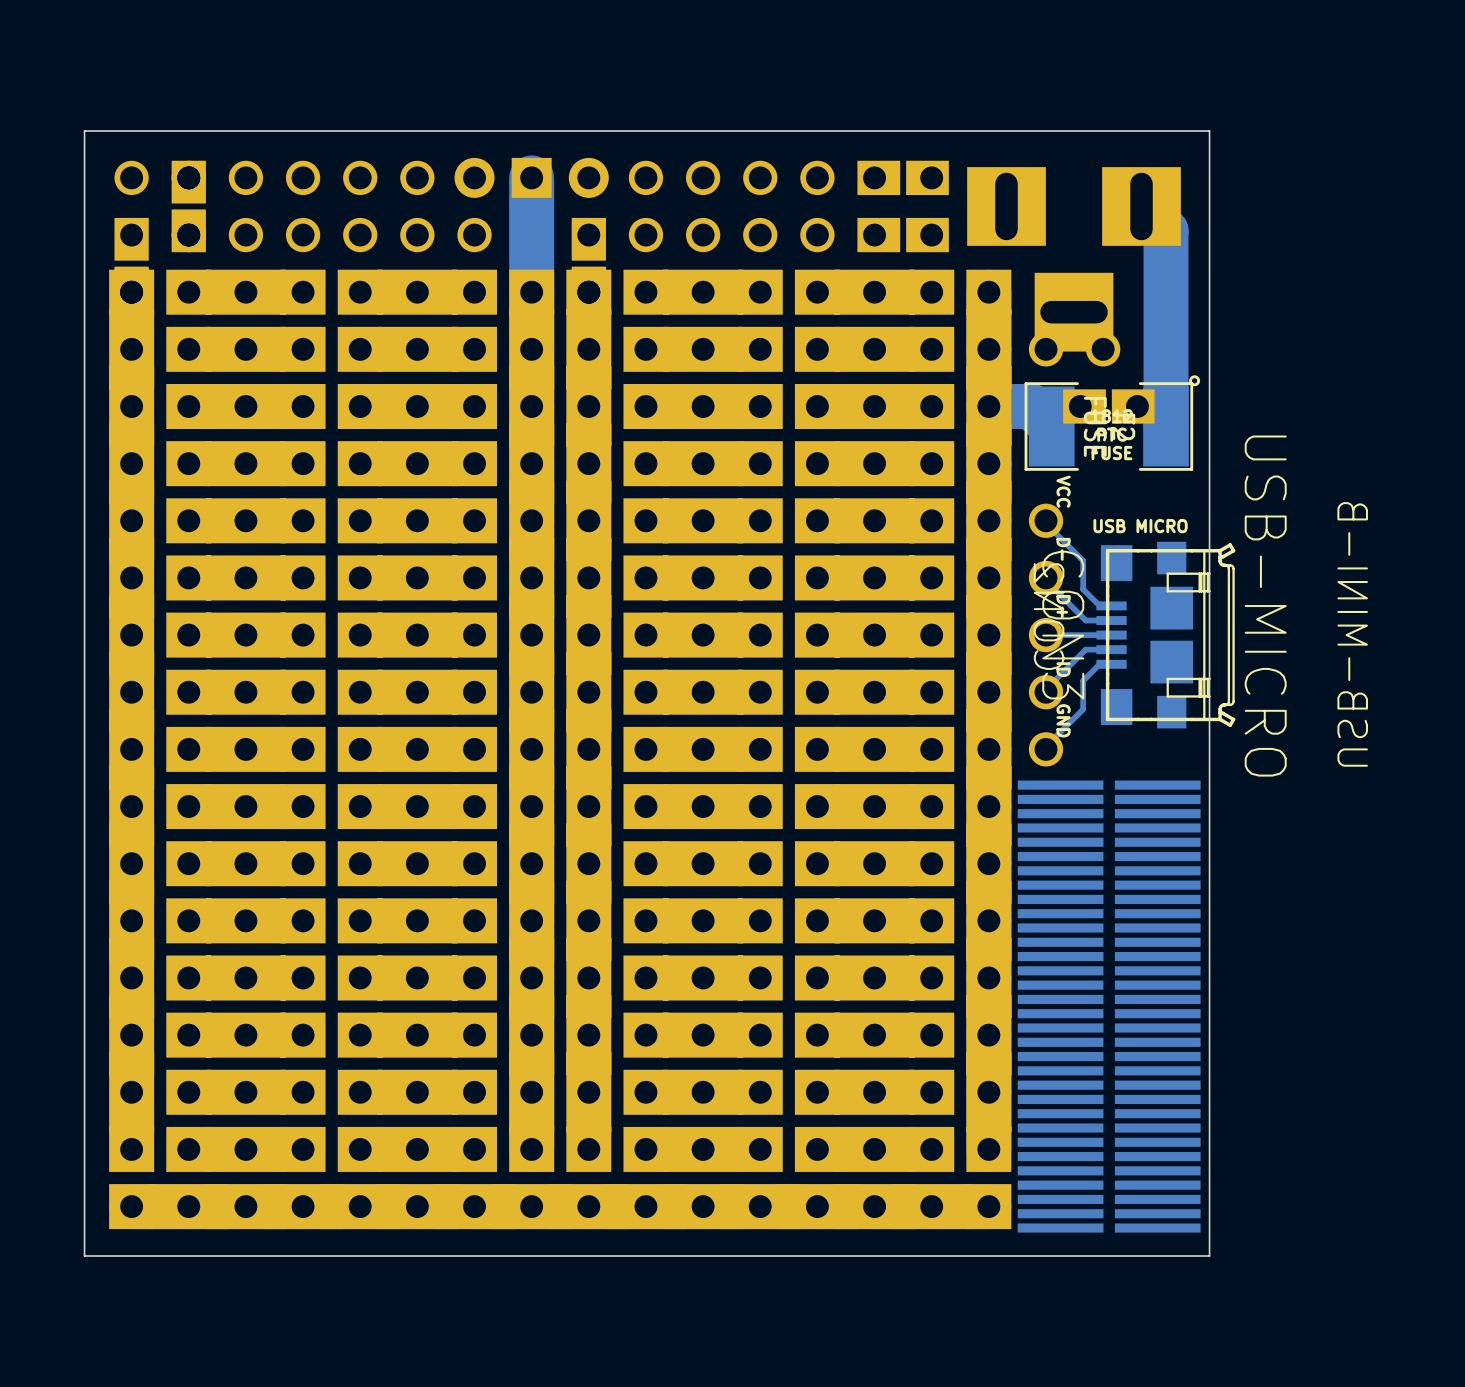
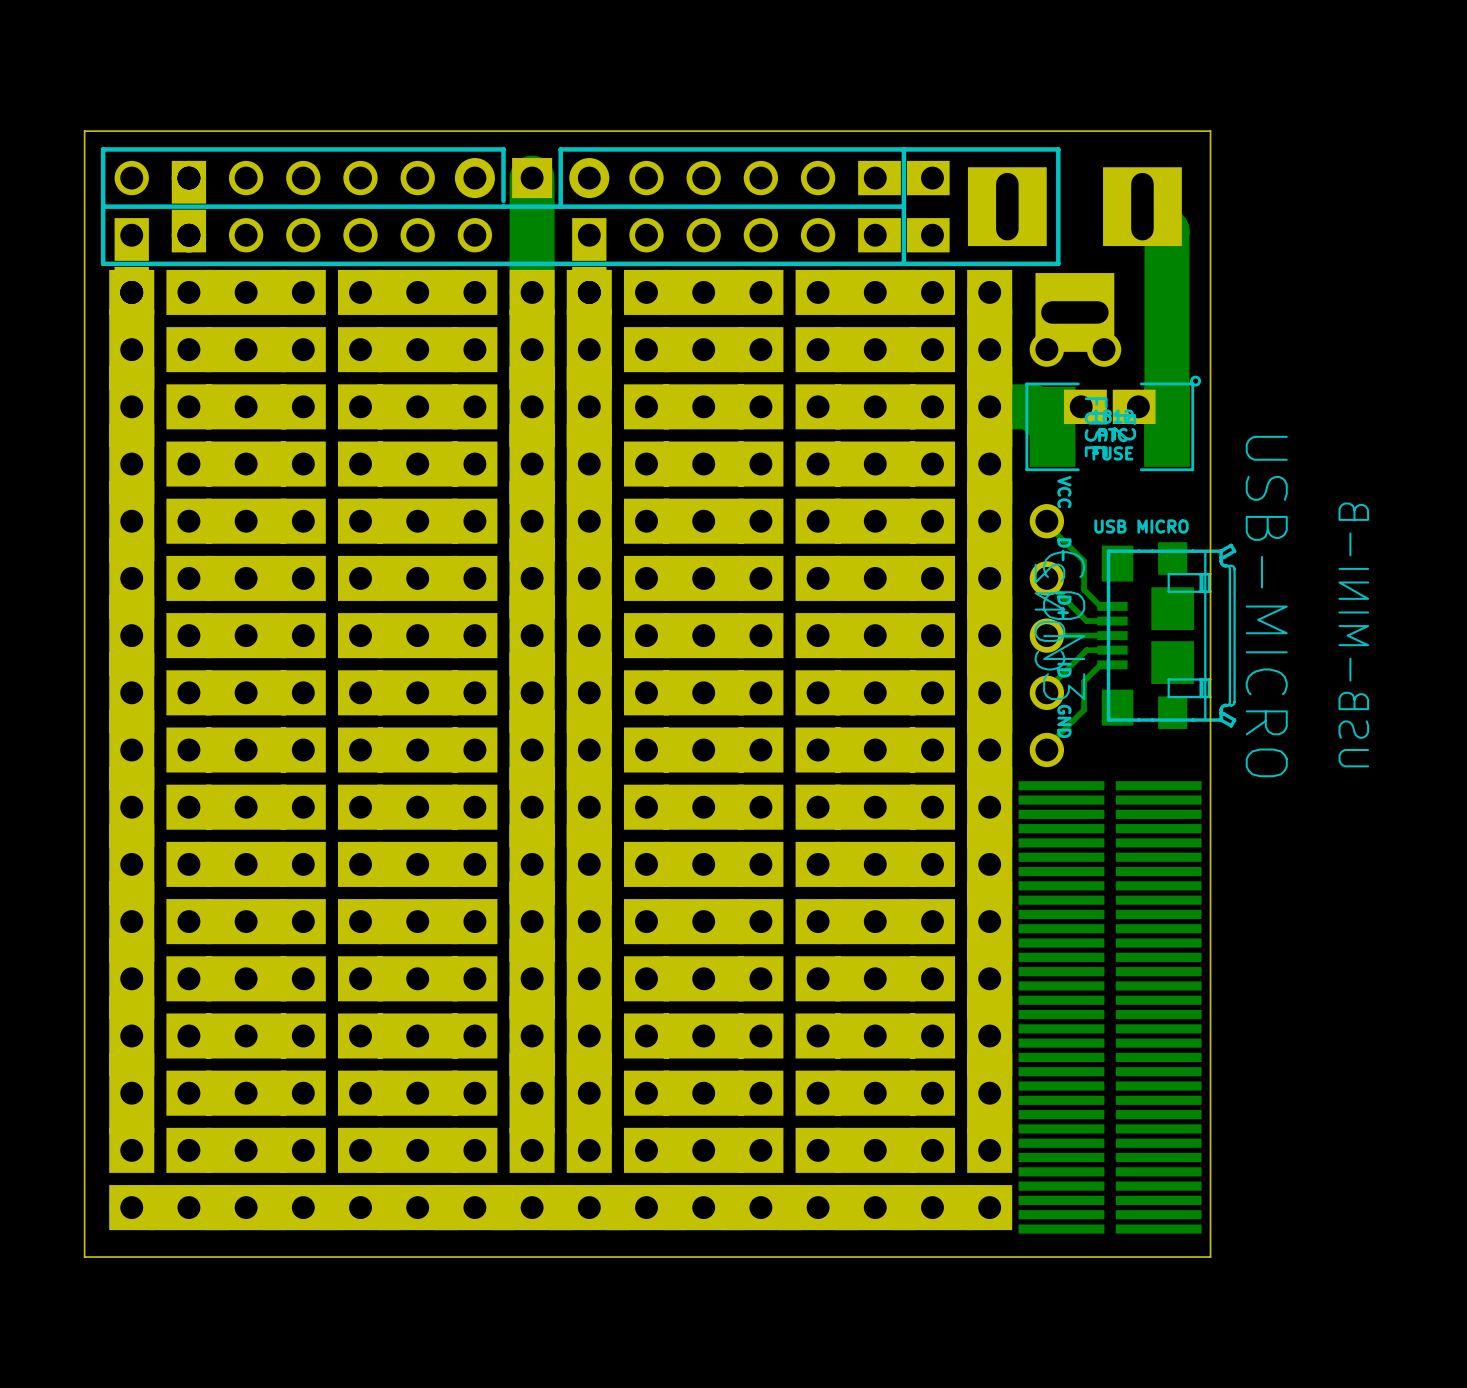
line: none -> (903, 149) (903, 263)
line: none -> (503, 200) (503, 149) (103, 149) (103, 263) (1058, 263) (1058, 149) (560, 149) (560, 206)
line: none -> (903, 206) (103, 206)

